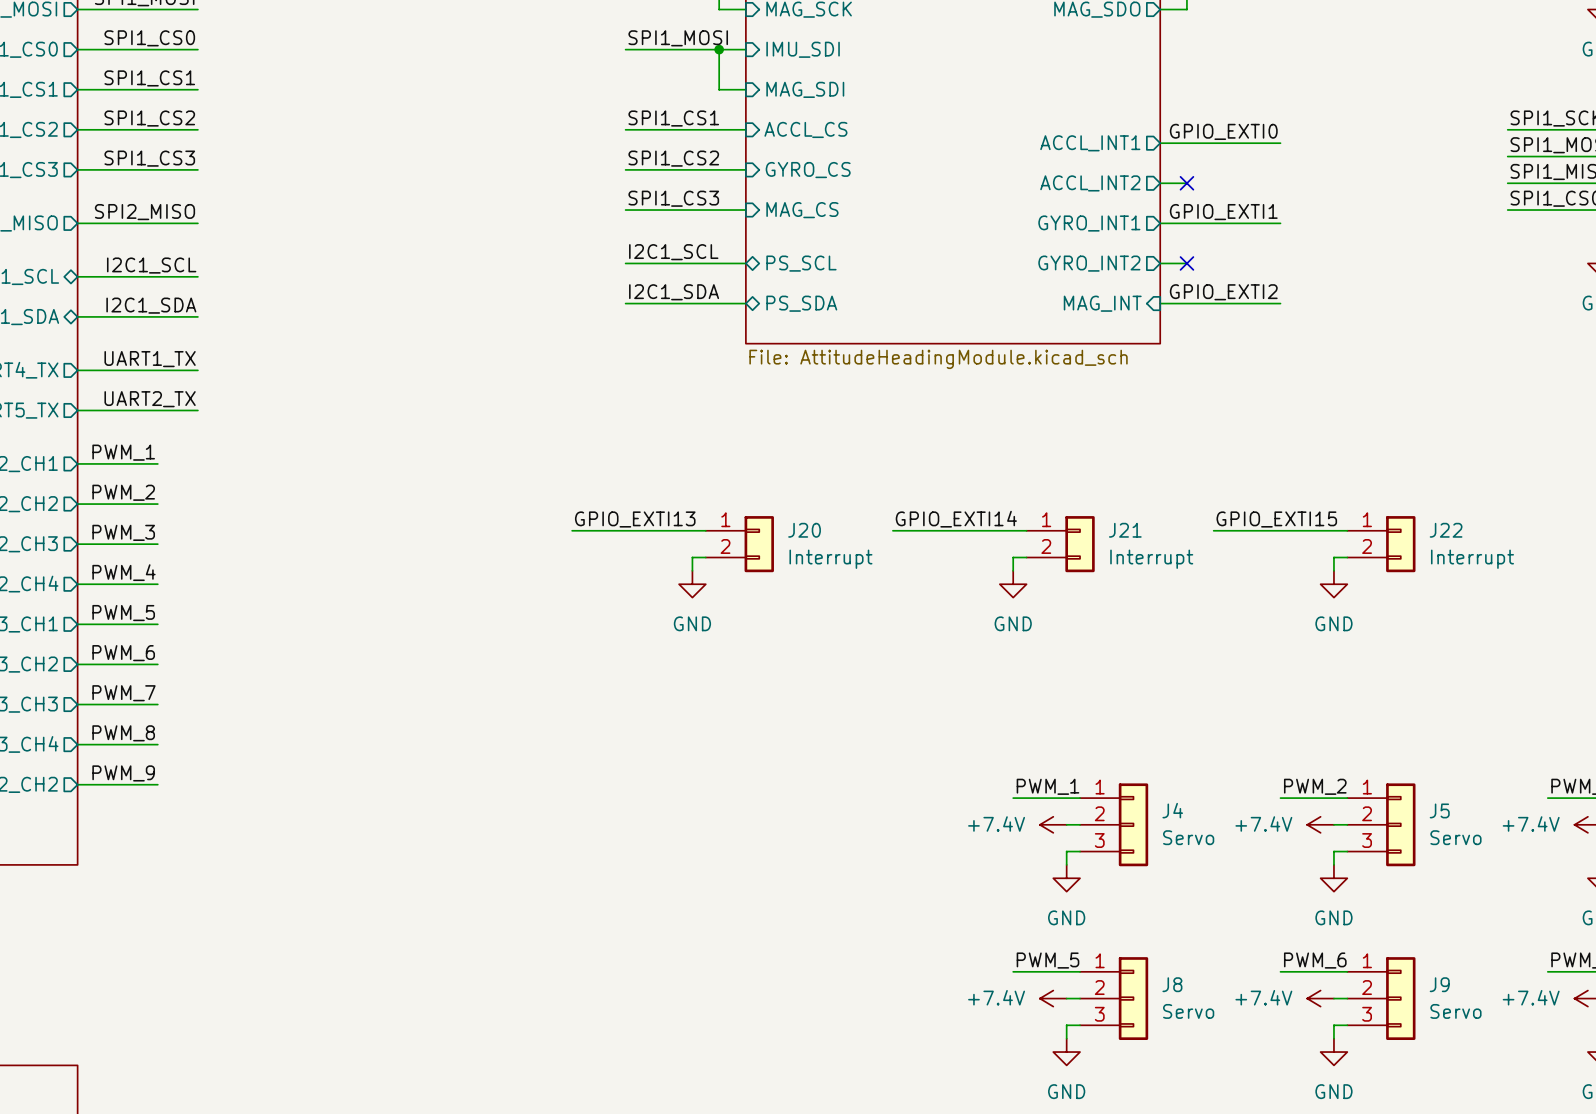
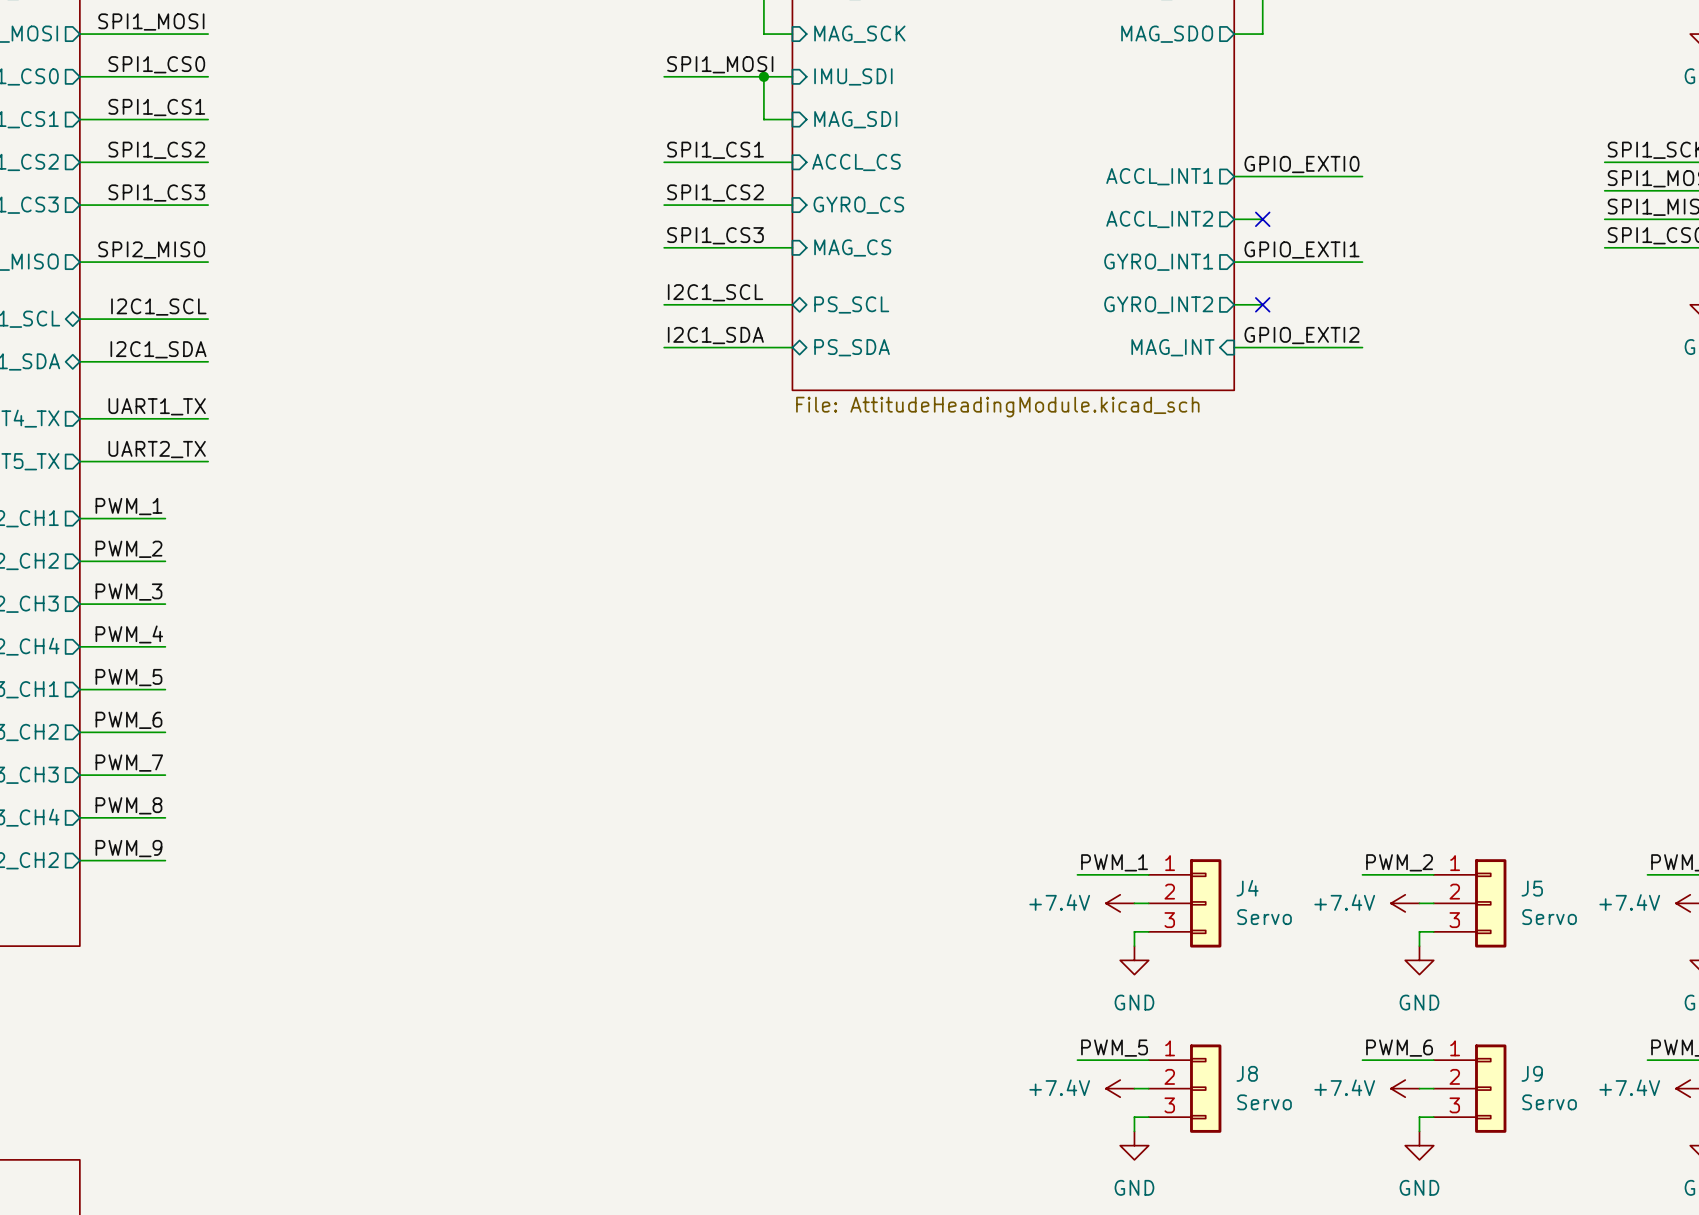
label: GPIO_EXTI13 (635, 519) -> none
label: GPIO_EXTI14 (956, 519) -> none
label: GPIO_EXTI15 (1276, 519) -> none
wire: (572, 530) (705, 530) -> none
wire: (892, 530) (1026, 530) -> none
wire: (1213, 530) (1347, 530) -> none
J20: Interrupt (739, 544) -> none
J21: Interrupt (1060, 544) -> none
J22: Interrupt (1381, 544) -> none
wire: (705, 557) (692, 557) (692, 570) -> none
wire: (1026, 557) (1013, 557) (1013, 570) -> none
wire: (1347, 557) (1333, 557) (1333, 570) -> none
power symbol: GND (692, 584) -> none
power symbol: GND (1013, 584) -> none
power symbol: GND (1333, 584) -> none

